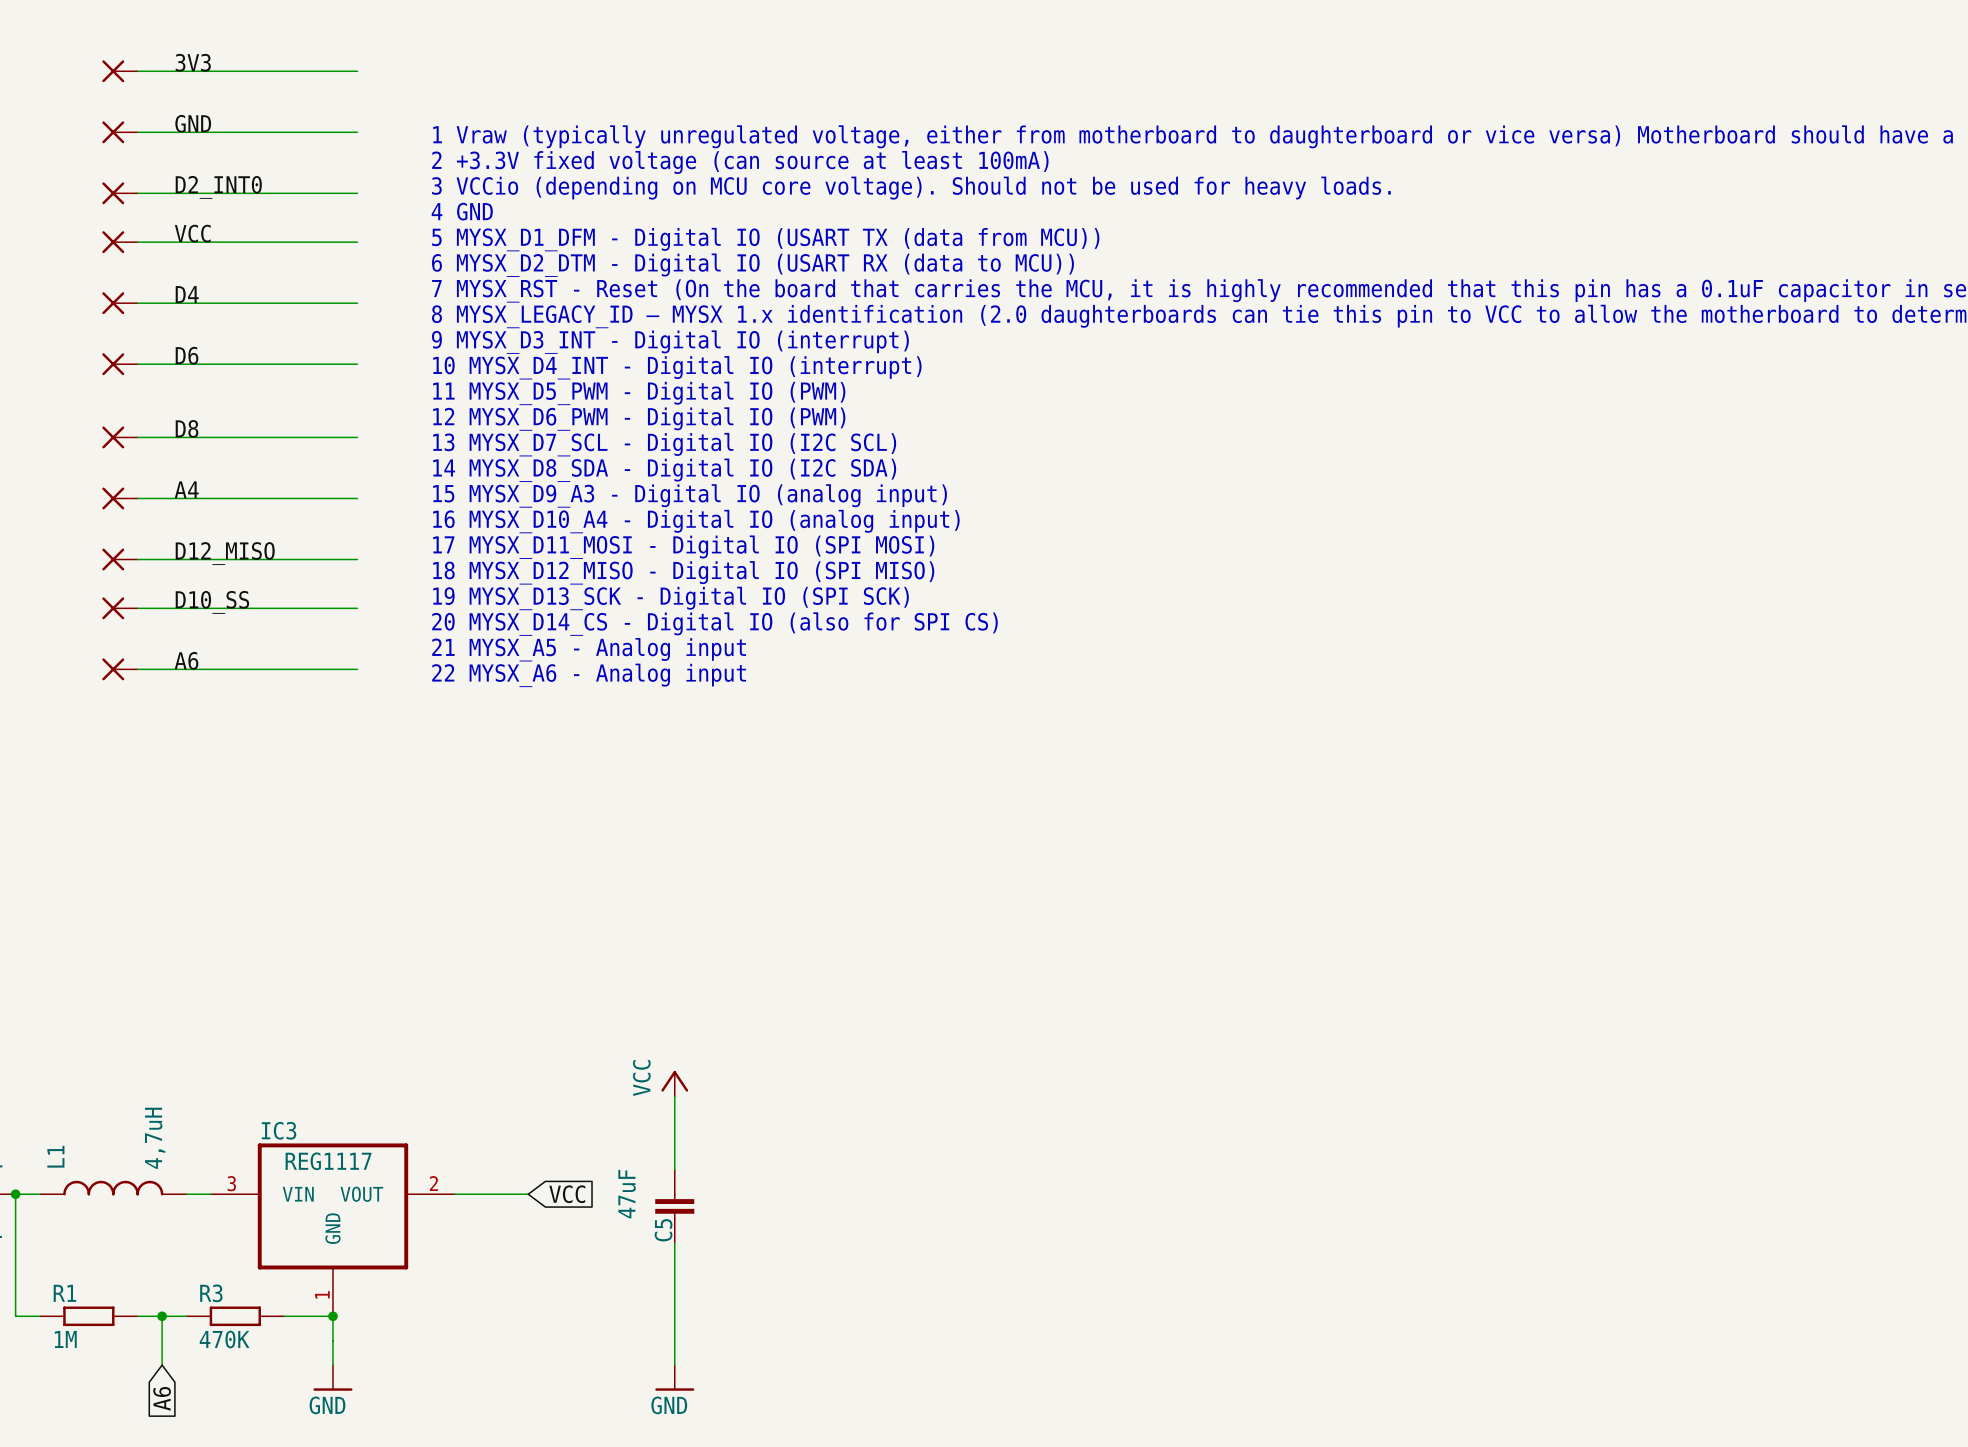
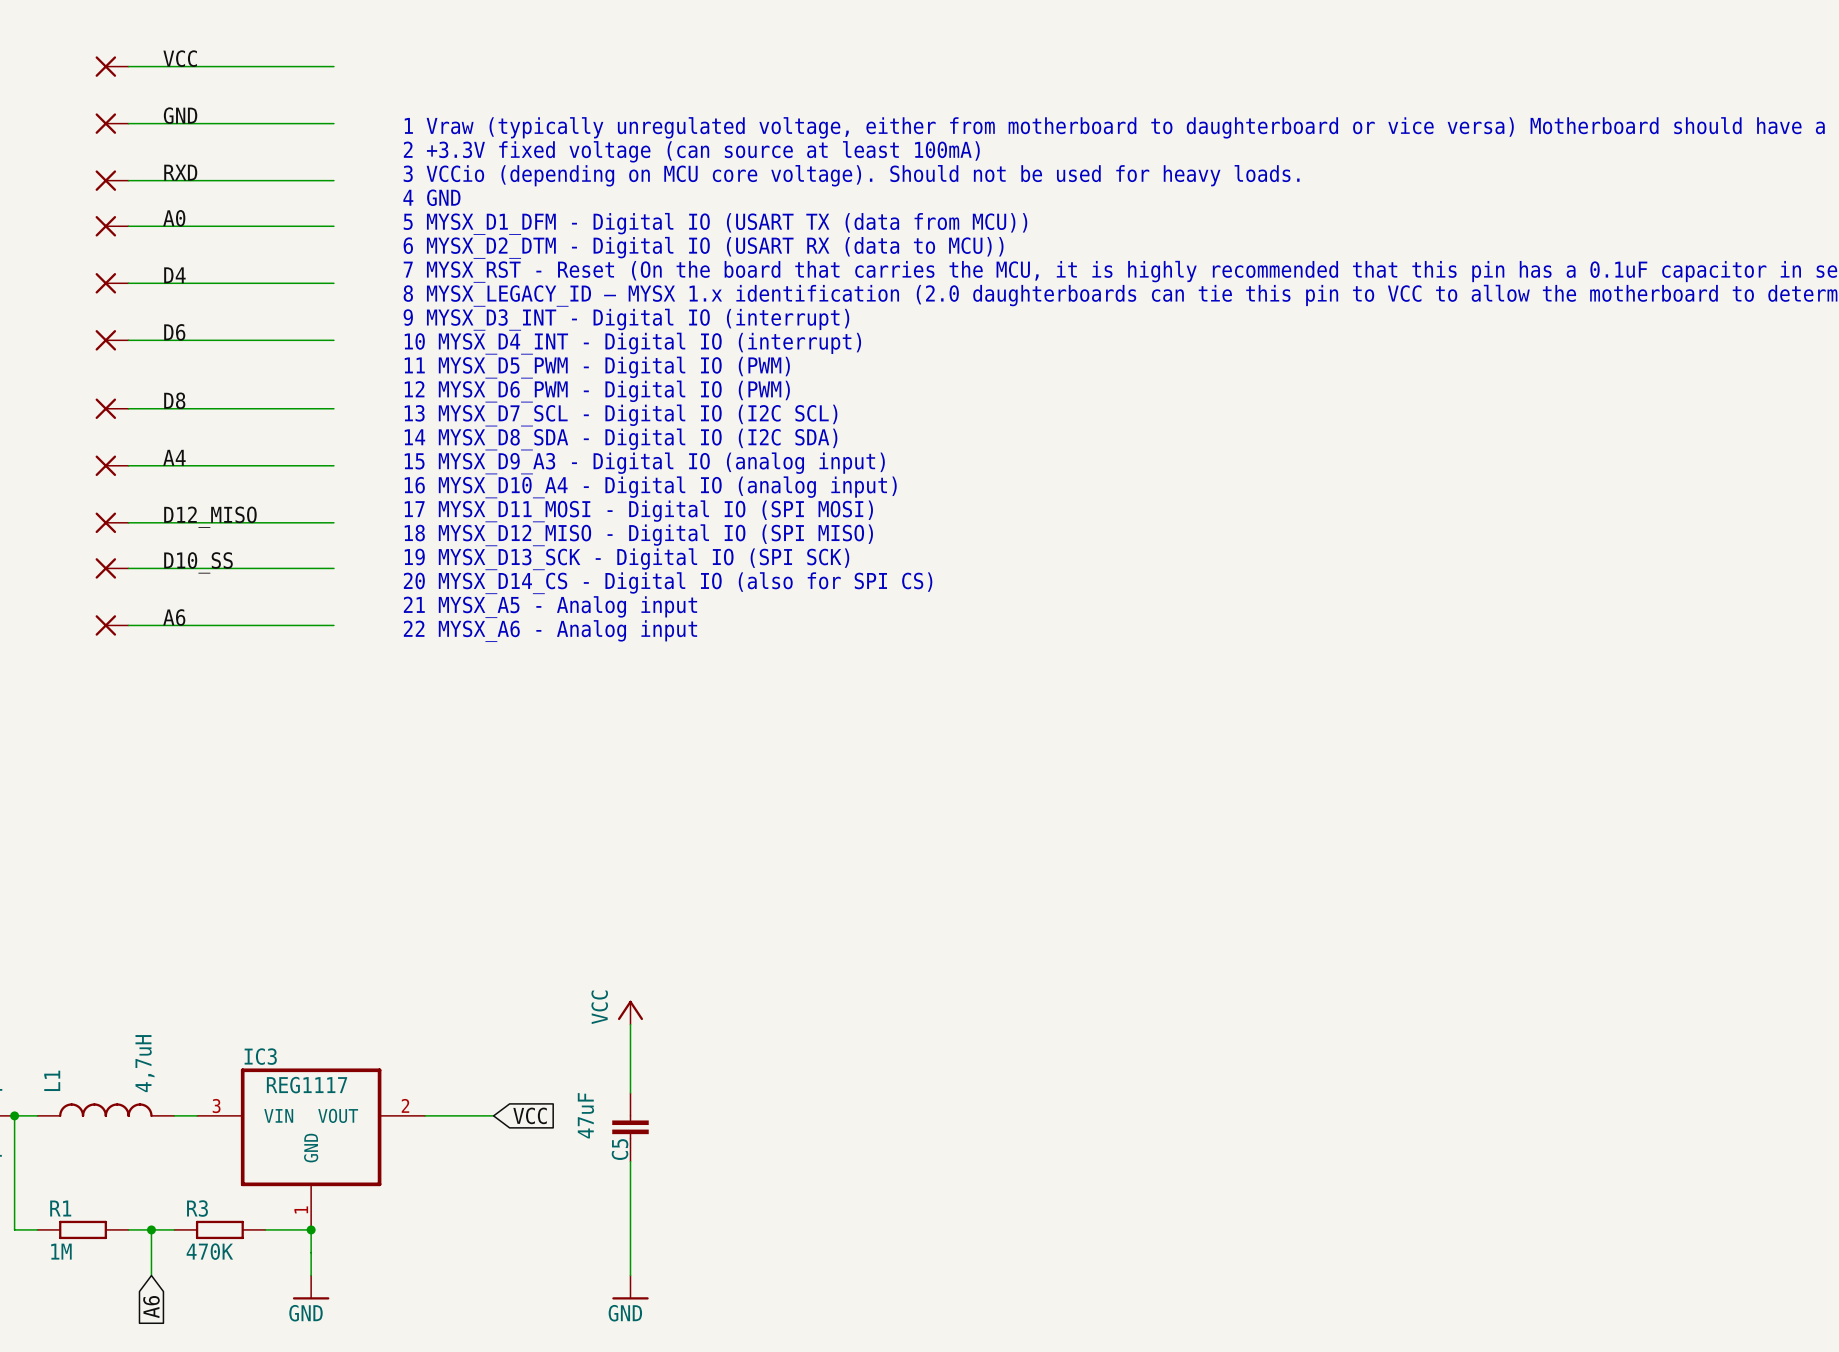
label: 3V3 (193, 62) -> VCC (180, 58)
label: D2_INT0 (218, 187) -> RXD (180, 172)
label: VCC (192, 233) -> A0 (174, 218)

